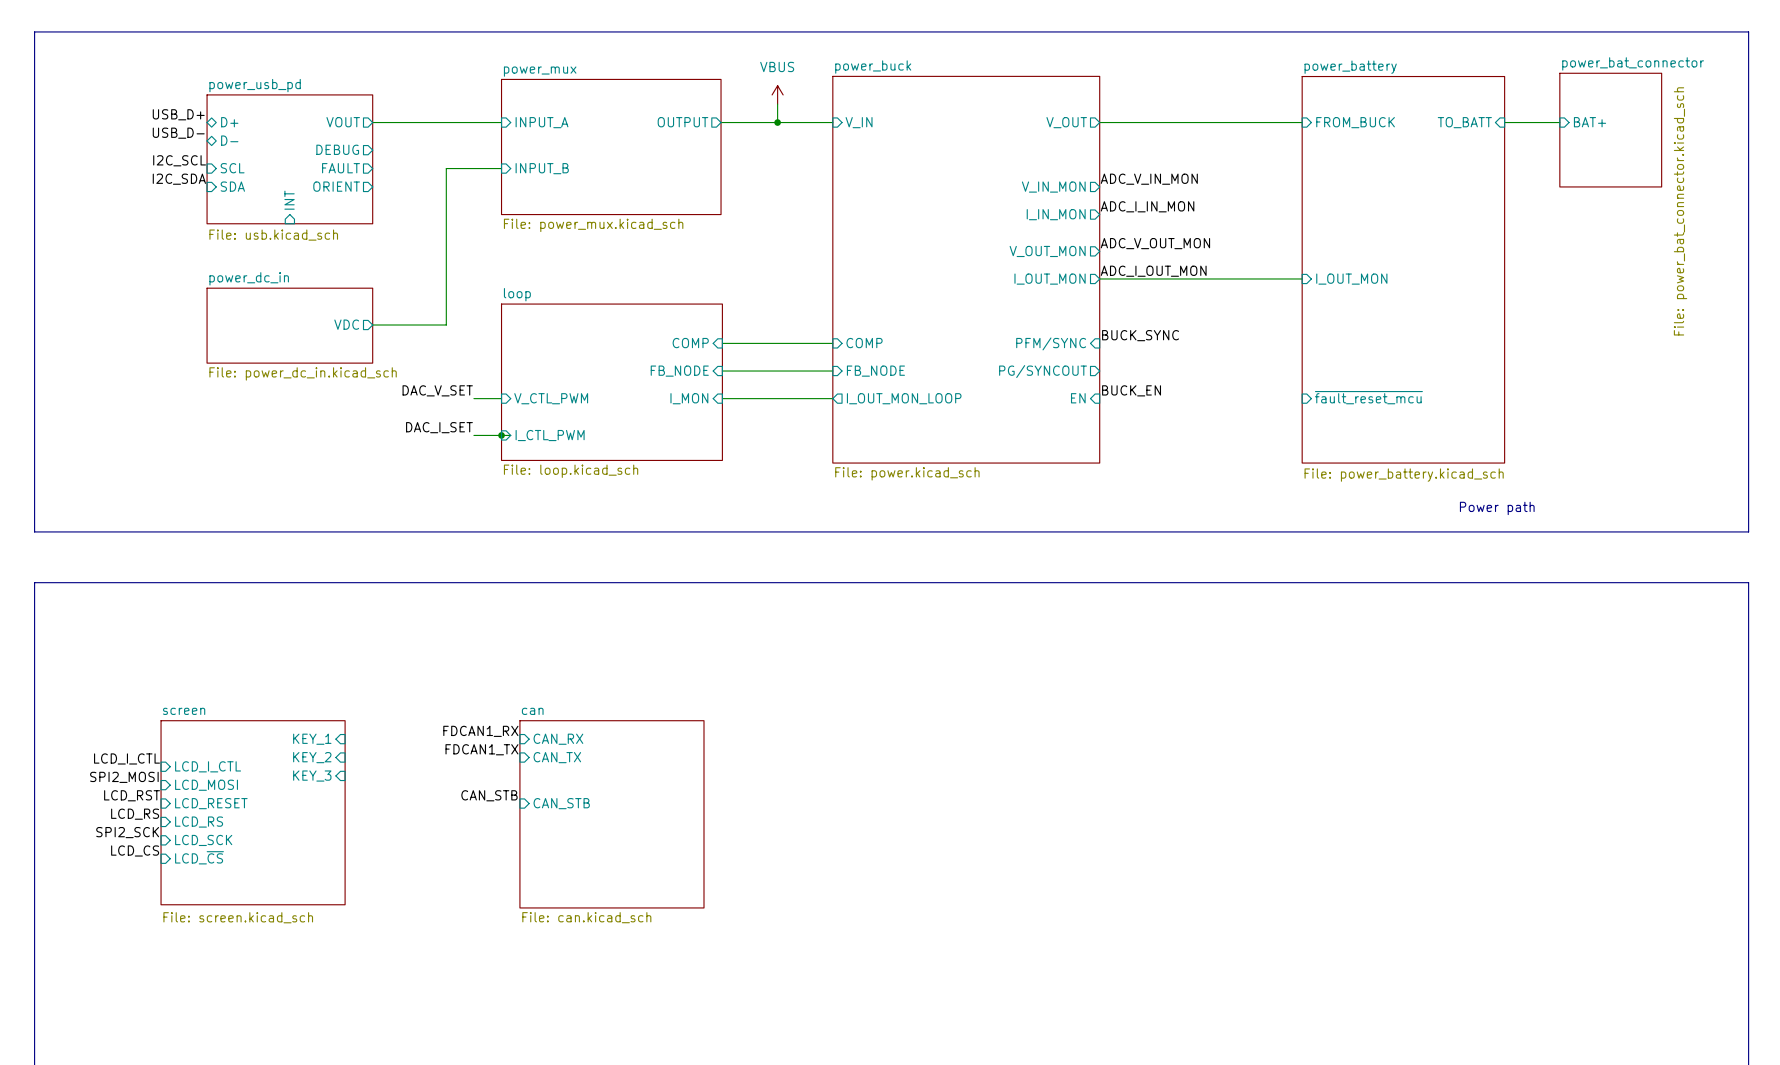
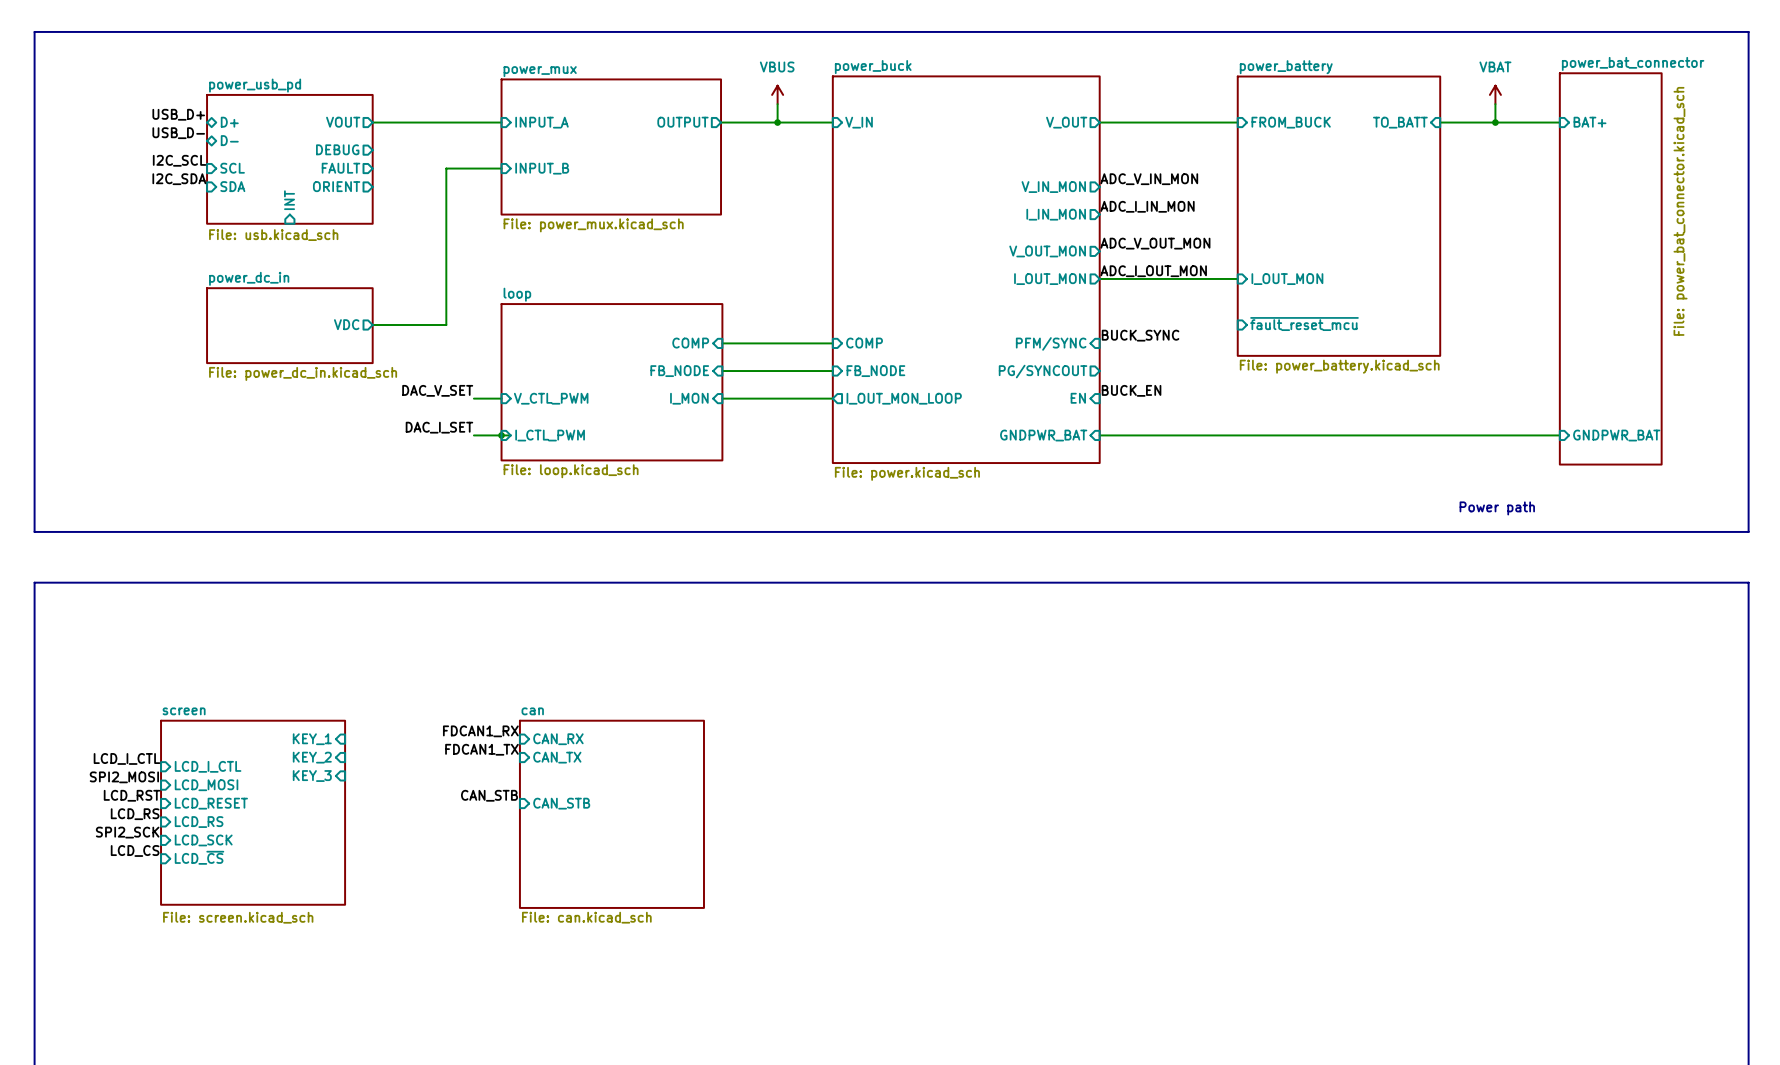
power symbol: none -> VBAT (1495, 94)
wire: none -> (1495, 104) (1495, 122)
wire: (1237, 122) (1302, 122) -> none
sheet pin position: FROM_BUCK (1355, 122) -> FROM_BUCK (1291, 122)
wire: none -> (1440, 122) (1504, 122)
sheet pin position: TO_BATT (1464, 122) -> TO_BATT (1400, 122)
junction: none -> (1495, 122)
sheet power_bat_connector: File: power_bat_connector.kicad_sch (1610, 130) -> none
sheet power_battery: none -> File: power_battery.kicad_sch (1338, 216)
sheet power_bat_connector: none -> File: power_bat_connector.kicad_sch (1610, 268)
sheet power_battery: File: power_battery.kicad_sch (1403, 269) -> none
wire: (1237, 278) (1302, 278) -> none
sheet pin position: I_OUT_MON (1351, 279) -> I_OUT_MON (1287, 279)
sheet pin position: ~{fault_reset_mcu} (1368, 397) -> ~{fault_reset_mcu} (1304, 324)
sheet pin: none -> GNDPWR_BAT (1043, 435)
wire: none -> (1099, 435) (1559, 435)
sheet pin: none -> GNDPWR_BAT (1616, 435)

